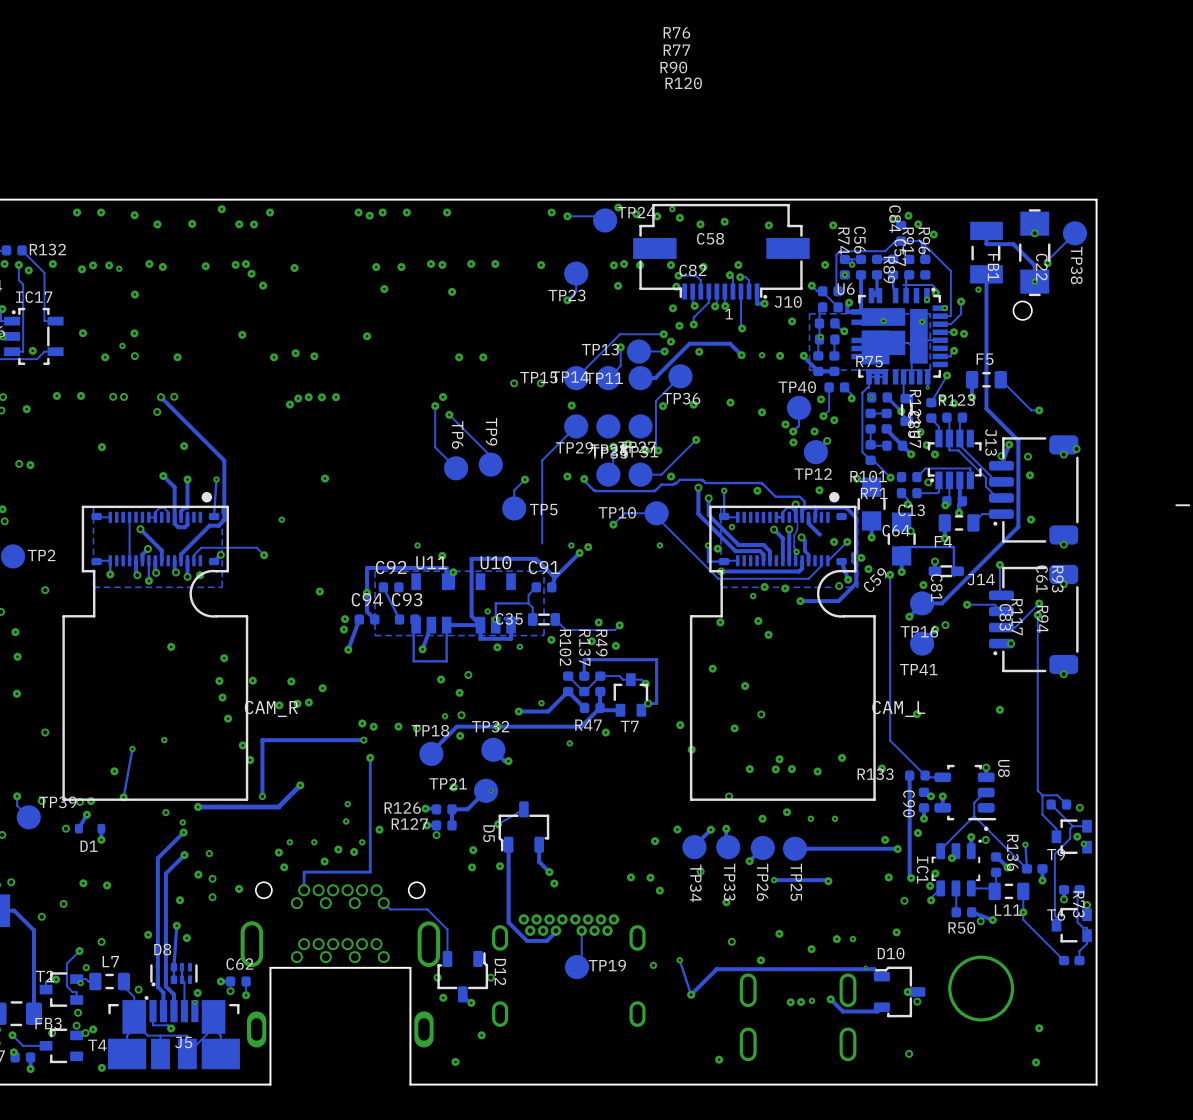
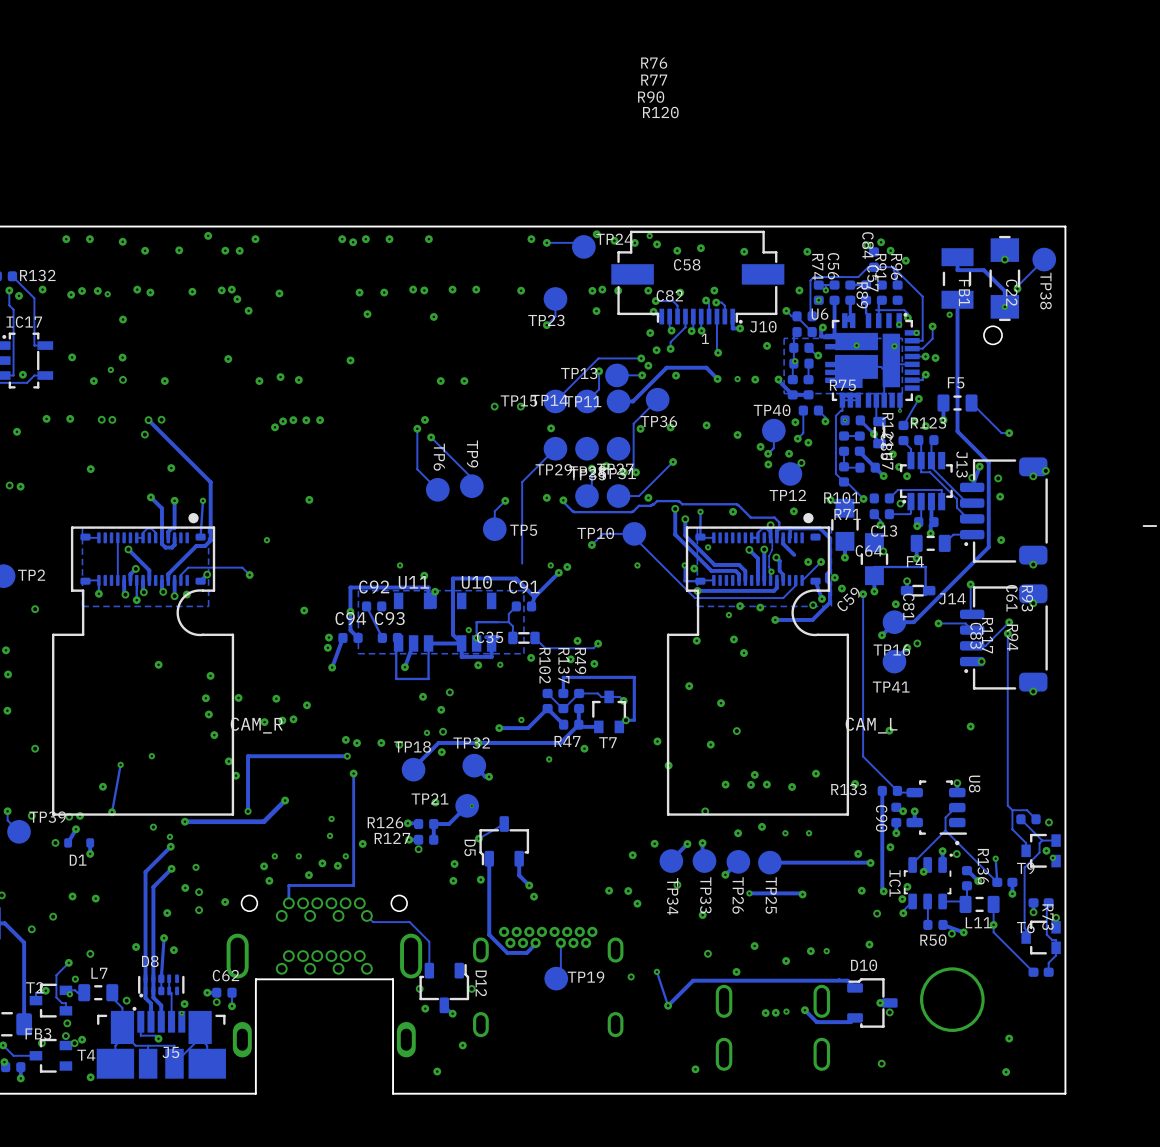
via: (865, 967) -> none

